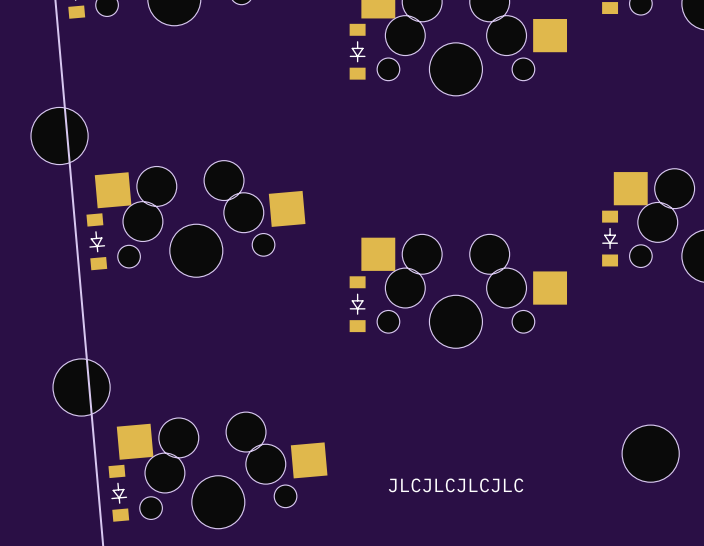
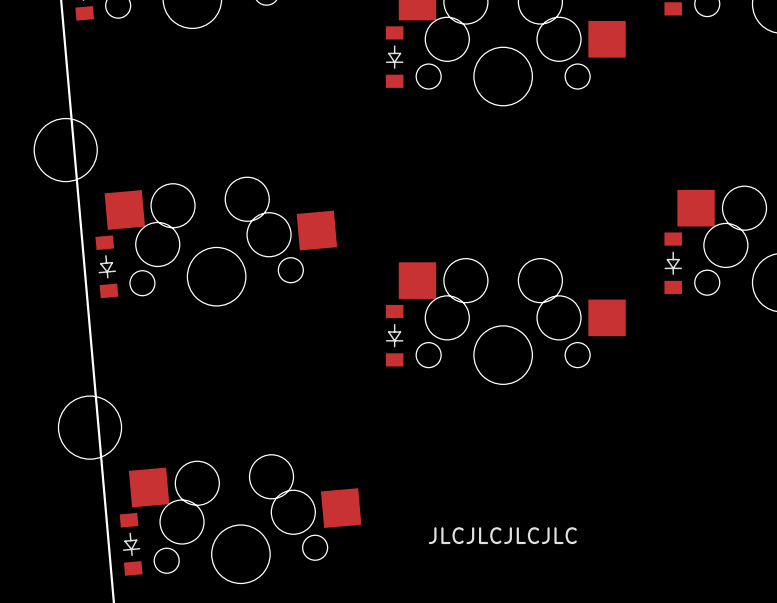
part: (650, 453) -> none

